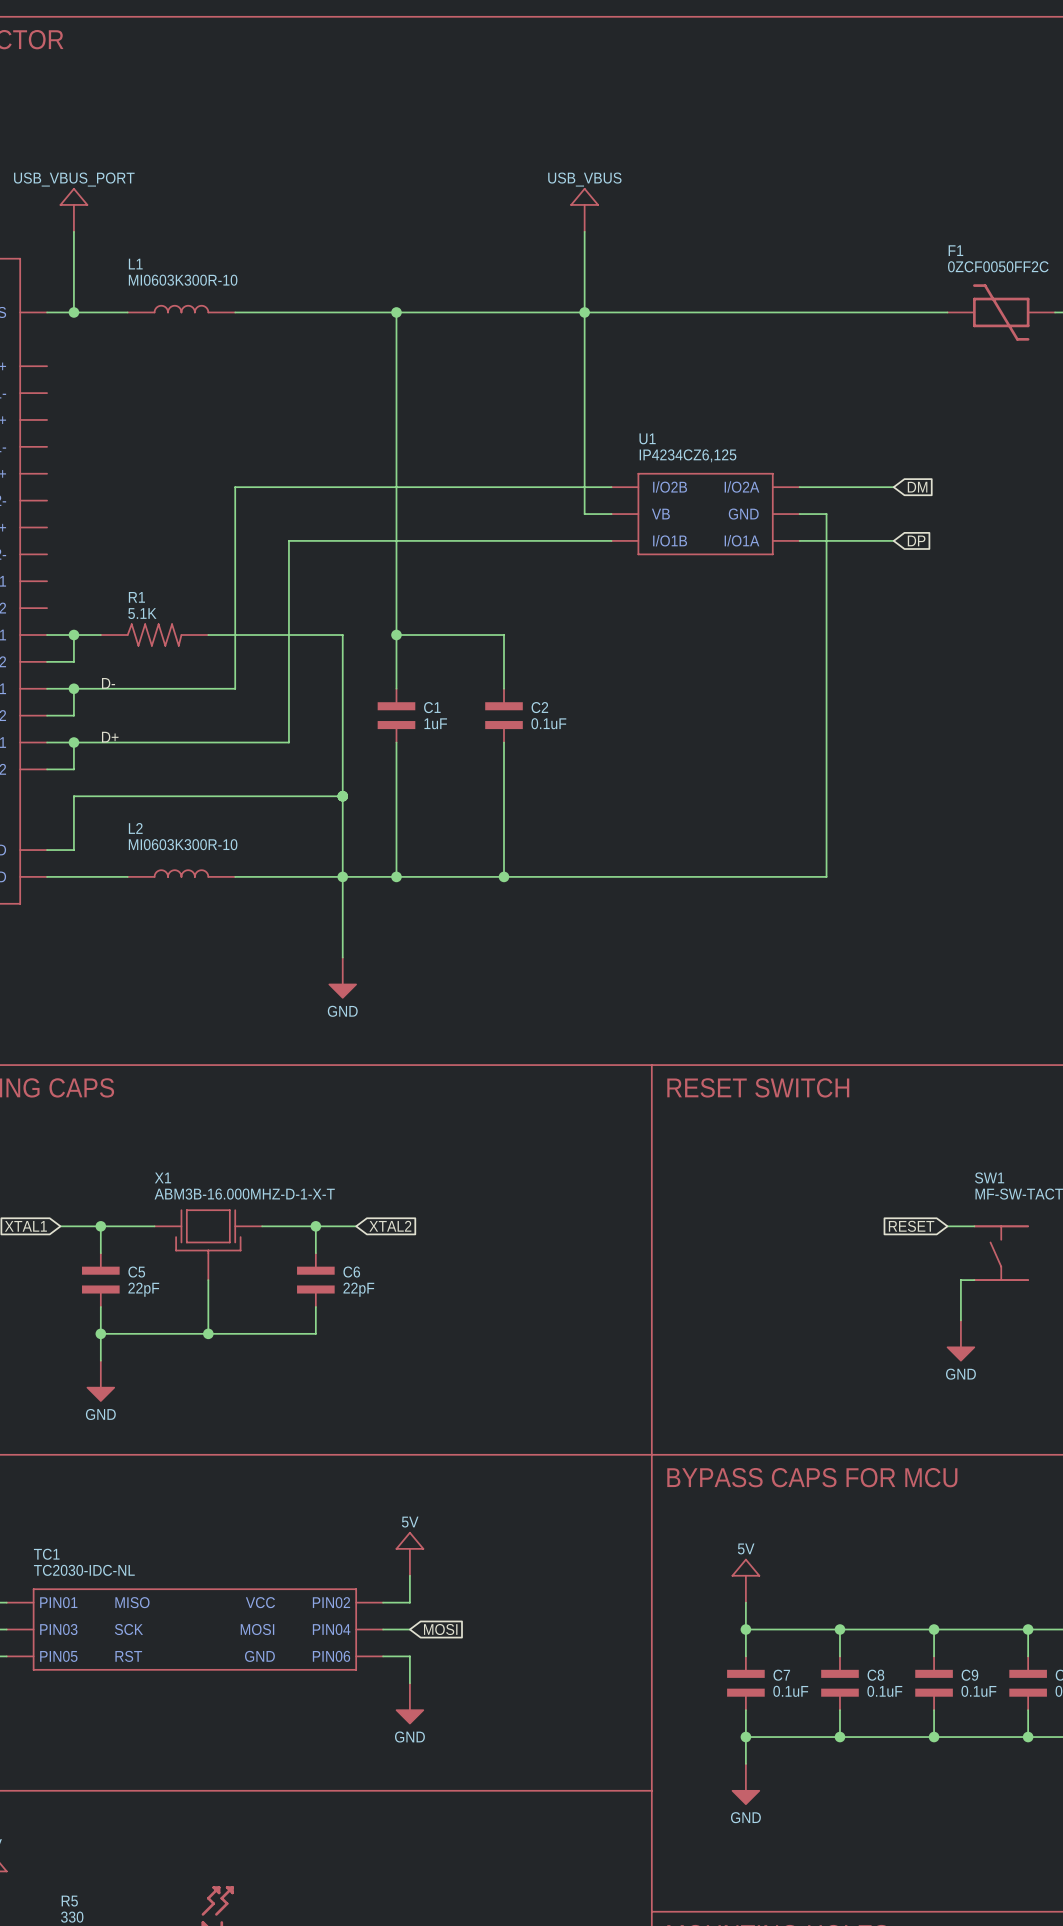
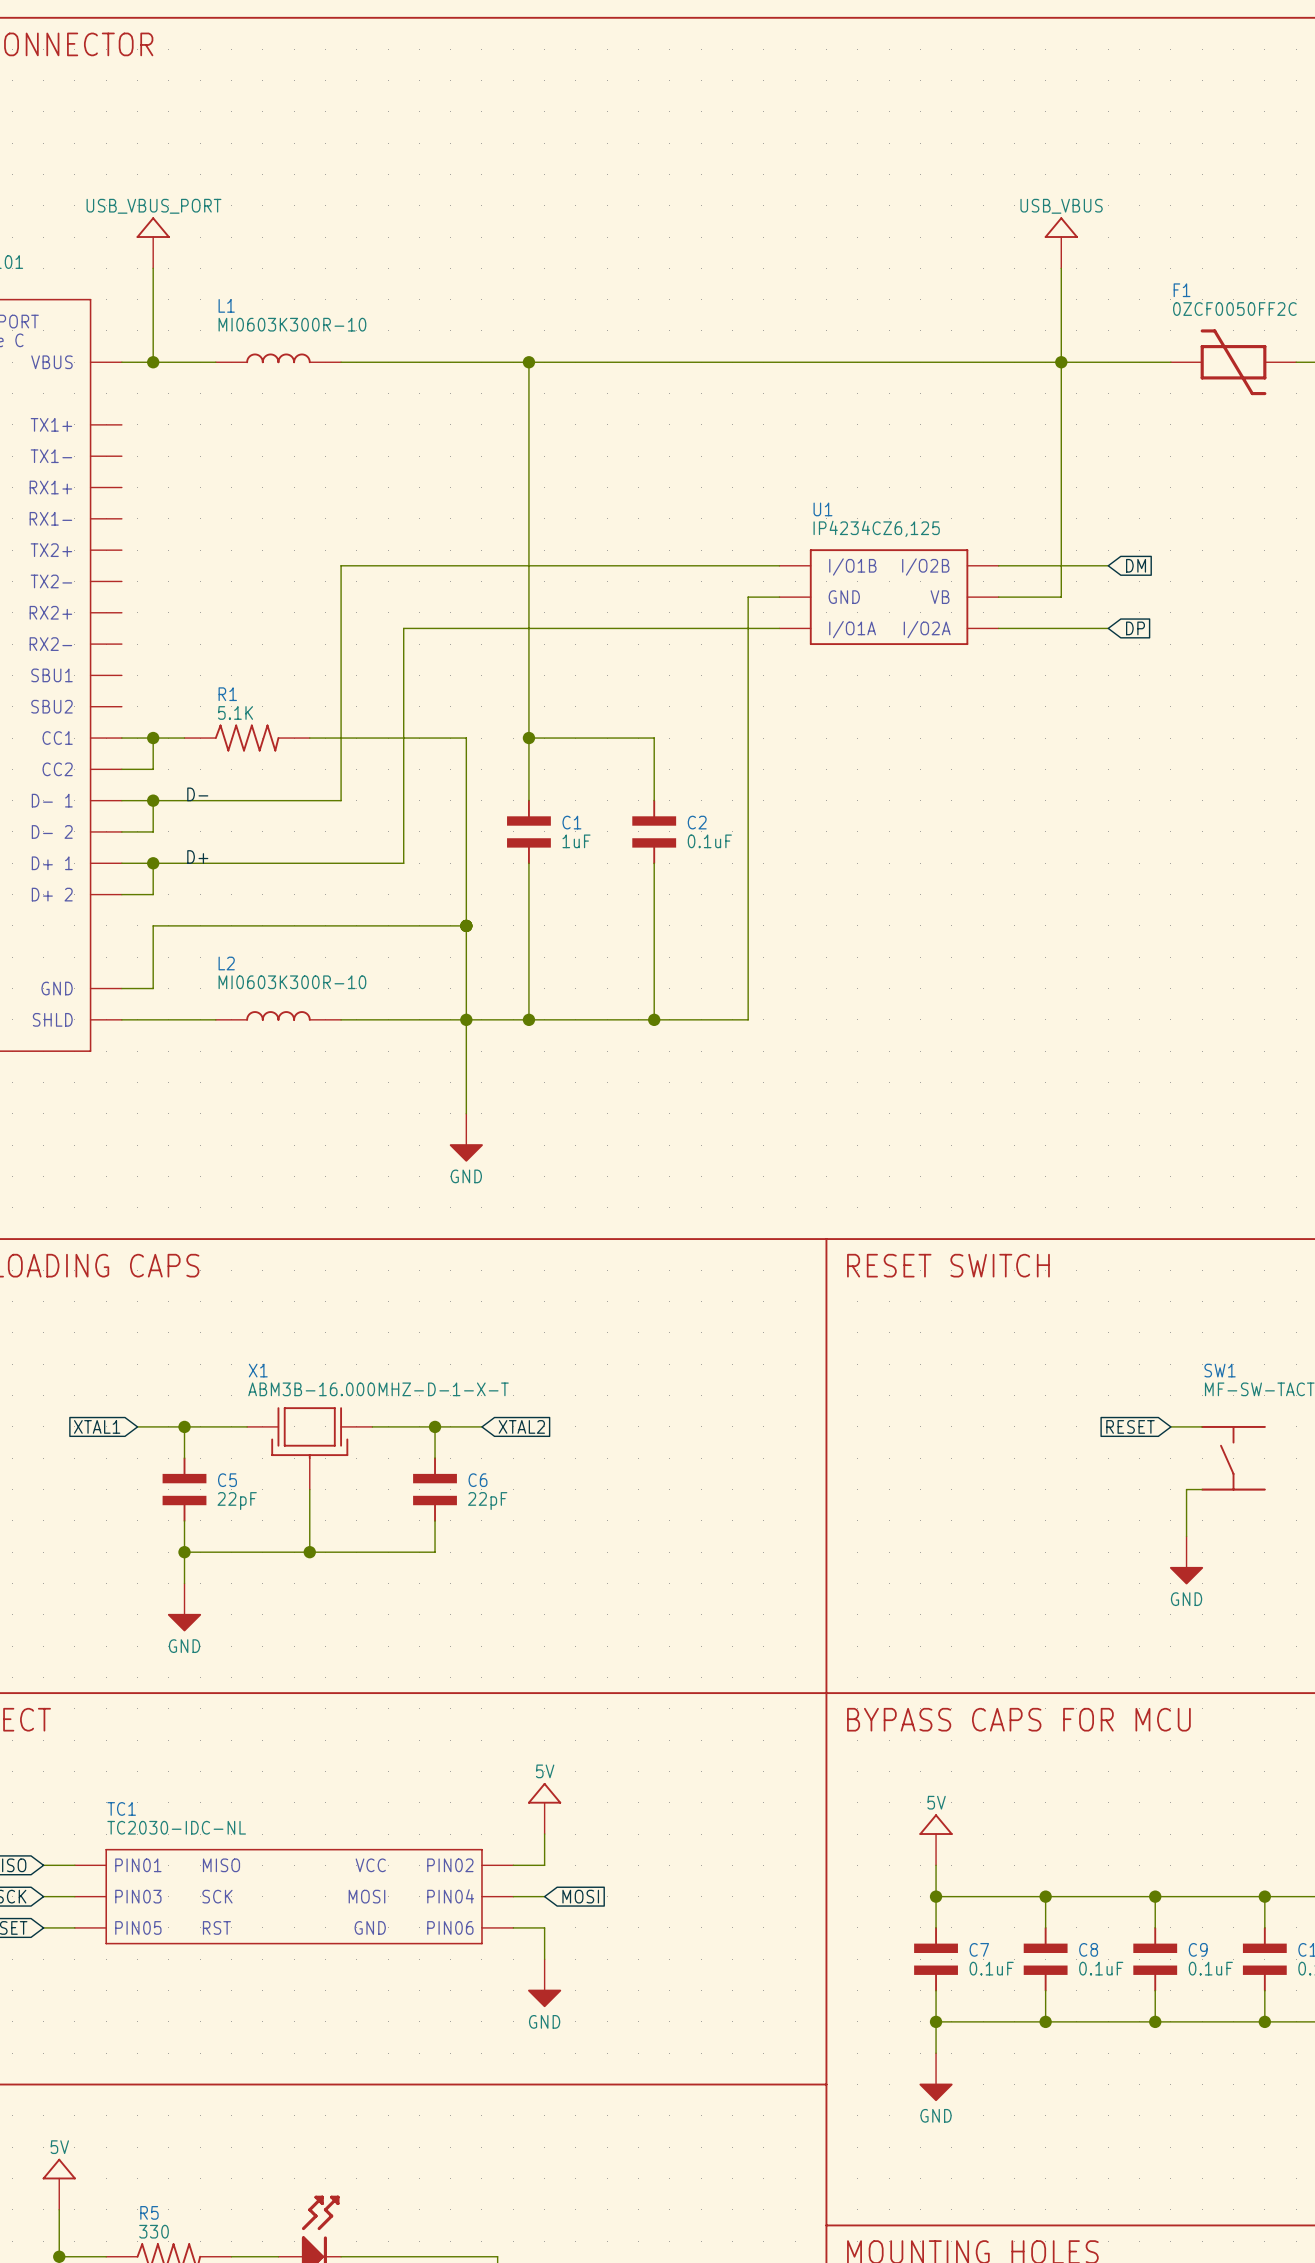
power symbol: USB_VBUS (584, 209) -> none
power symbol: none -> USB_VBUS (1061, 242)
wire: (584, 231) (584, 514) -> none
wire: none -> (1061, 268) (1061, 597) (1029, 597)
junction: (584, 312) -> none
junction: none -> (1061, 362)
U1 text: I/O2B (670, 486) -> I/O1B (852, 566)
U1 text: I/O2A (742, 486) -> I/O2B (925, 566)
U1 text: VB (660, 514) -> GND (844, 597)
U1 text: GND (743, 514) -> VB (940, 597)
wire: (826, 514) (826, 876) (584, 876) -> (748, 597) (748, 1019)
U1 text: I/O1B (670, 540) -> I/O1A (852, 629)
U1 text: I/O1A (742, 540) -> I/O2A (927, 629)

